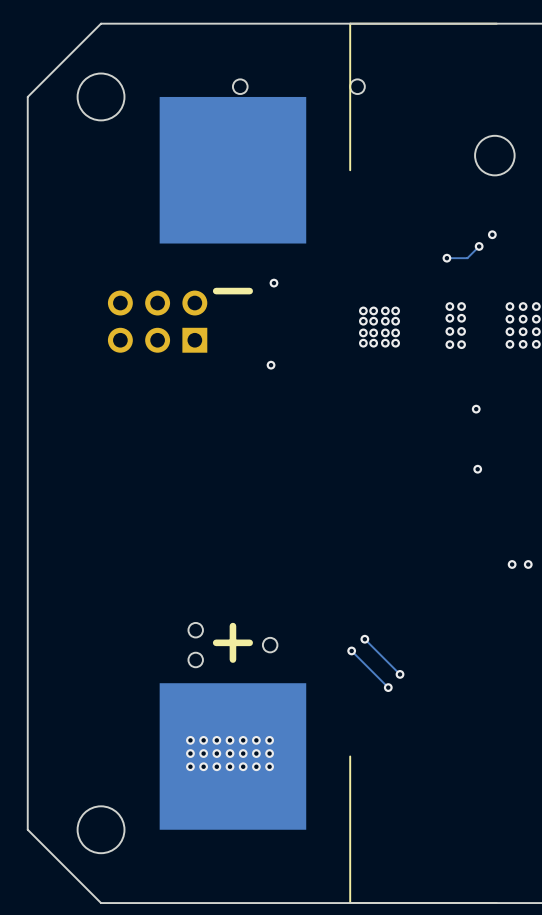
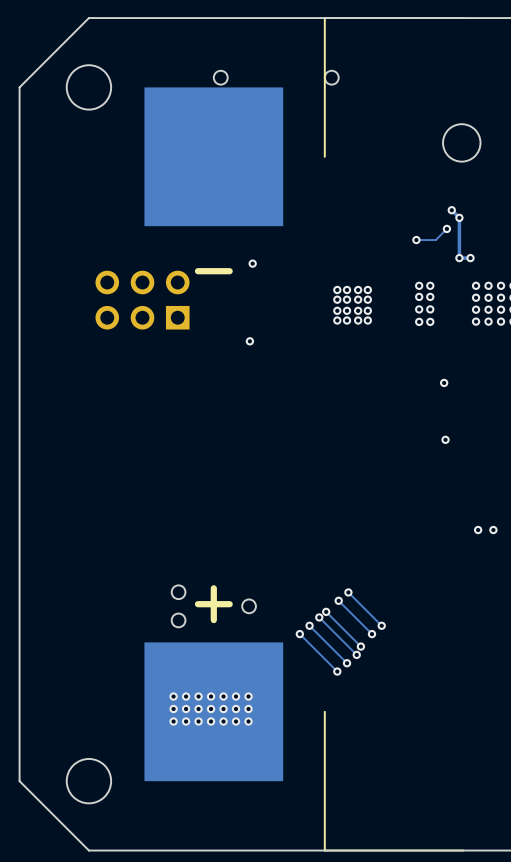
track: none -> (451, 210) (459, 217) (459, 258) (470, 258)
via: none -> (451, 210)
via: none -> (459, 258)
via: none -> (470, 258)
track: none -> (348, 592) (381, 625)
via: none -> (348, 592)
track: none -> (319, 617) (356, 654)
via: none -> (319, 617)
track: none -> (309, 625) (348, 663)
via: none -> (309, 625)
via: none -> (381, 625)
track: none -> (299, 634) (337, 671)
via: none -> (299, 634)
via: none -> (356, 654)
via: none -> (347, 663)
via: none -> (337, 671)

